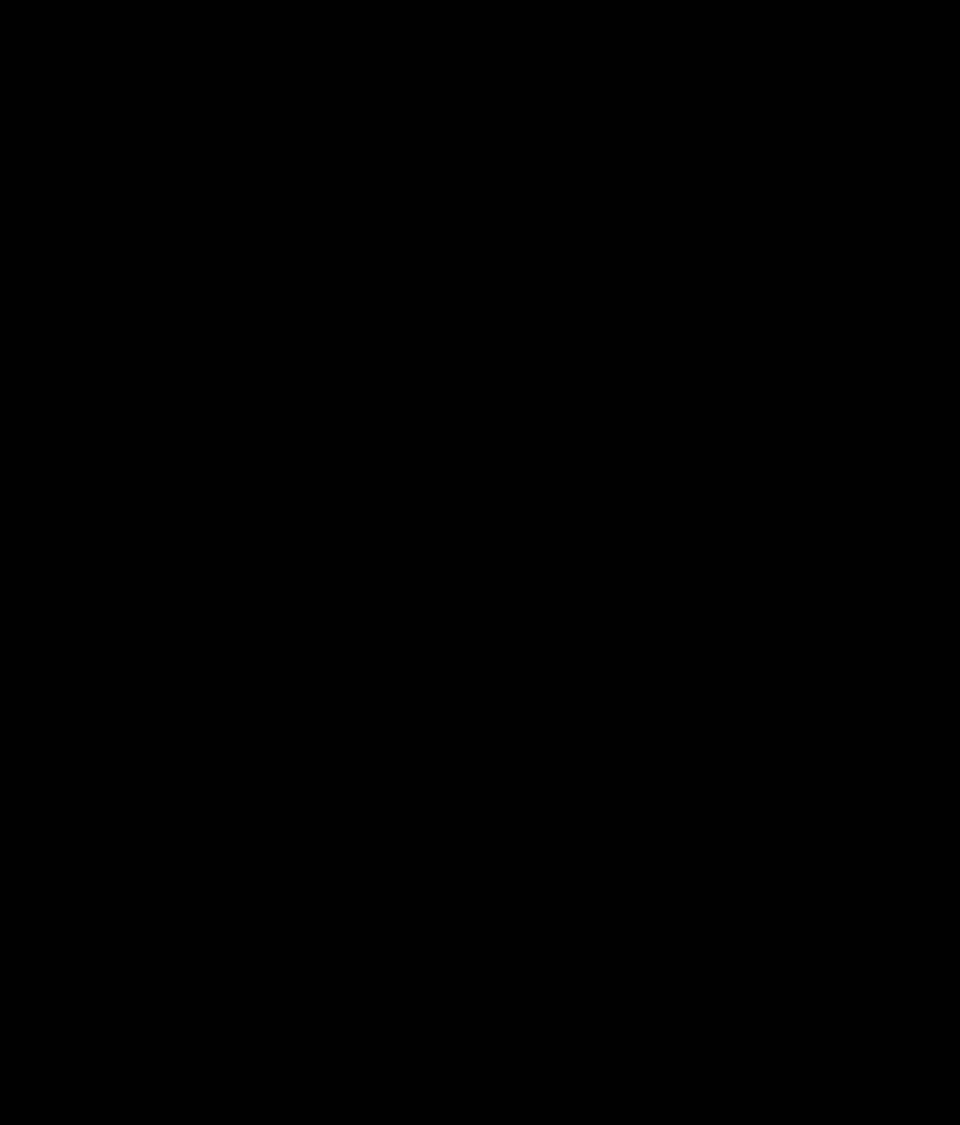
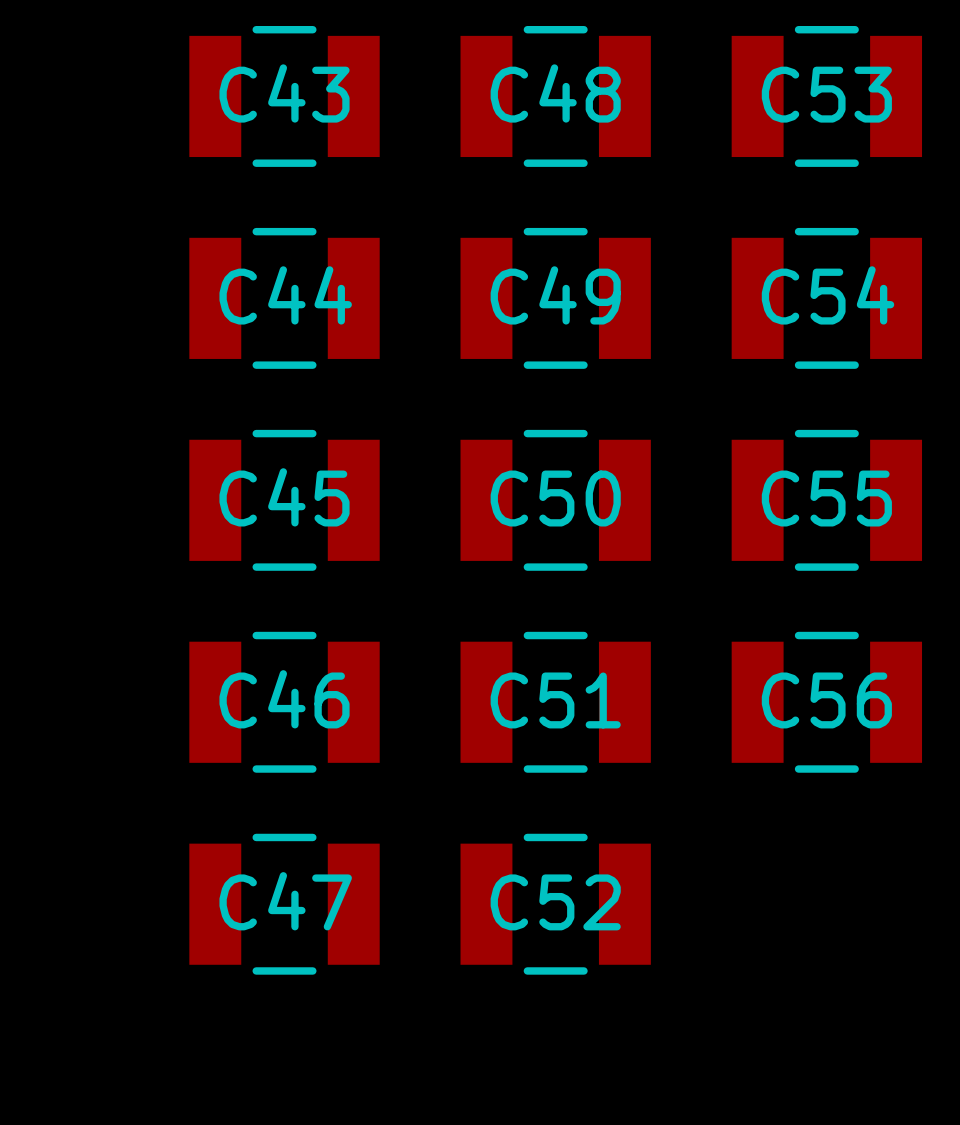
C43: none -> (284, 96)
C48: none -> (555, 96)
C53: none -> (826, 96)
C44: none -> (284, 298)
C49: none -> (555, 298)
C54: none -> (826, 298)
C45: none -> (284, 500)
C50: none -> (555, 500)
C55: none -> (826, 500)
C46: none -> (284, 702)
C51: none -> (555, 702)
C56: none -> (826, 702)
C47: none -> (284, 904)
C52: none -> (555, 904)

